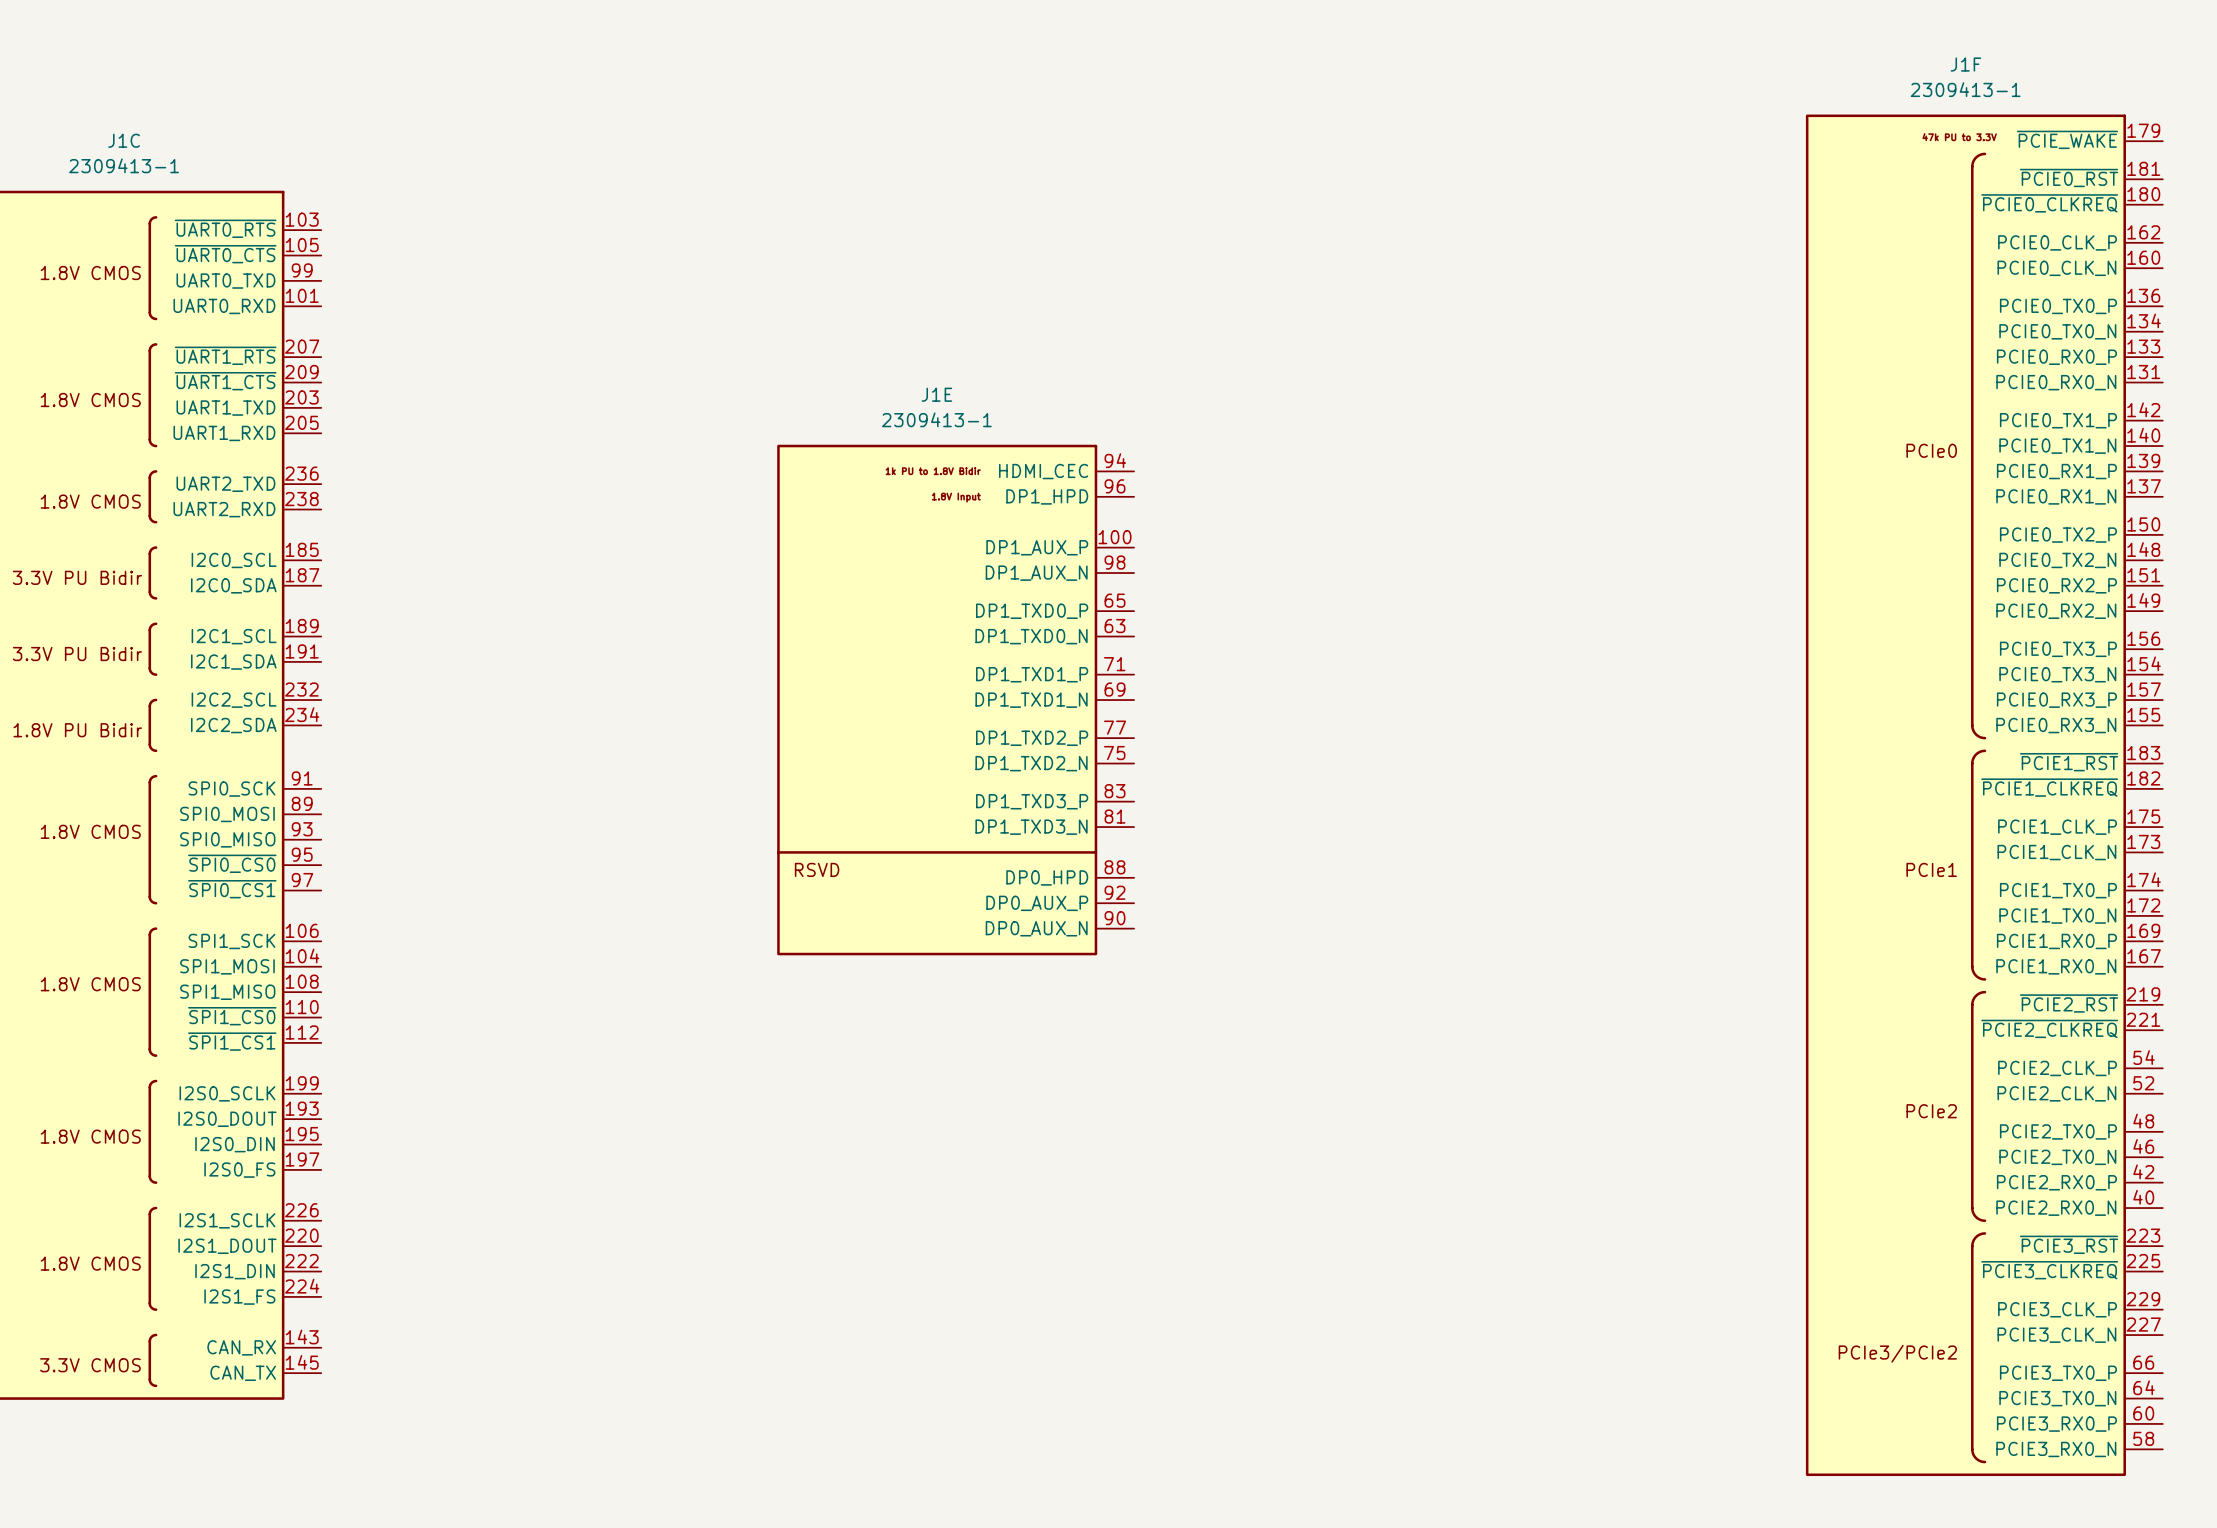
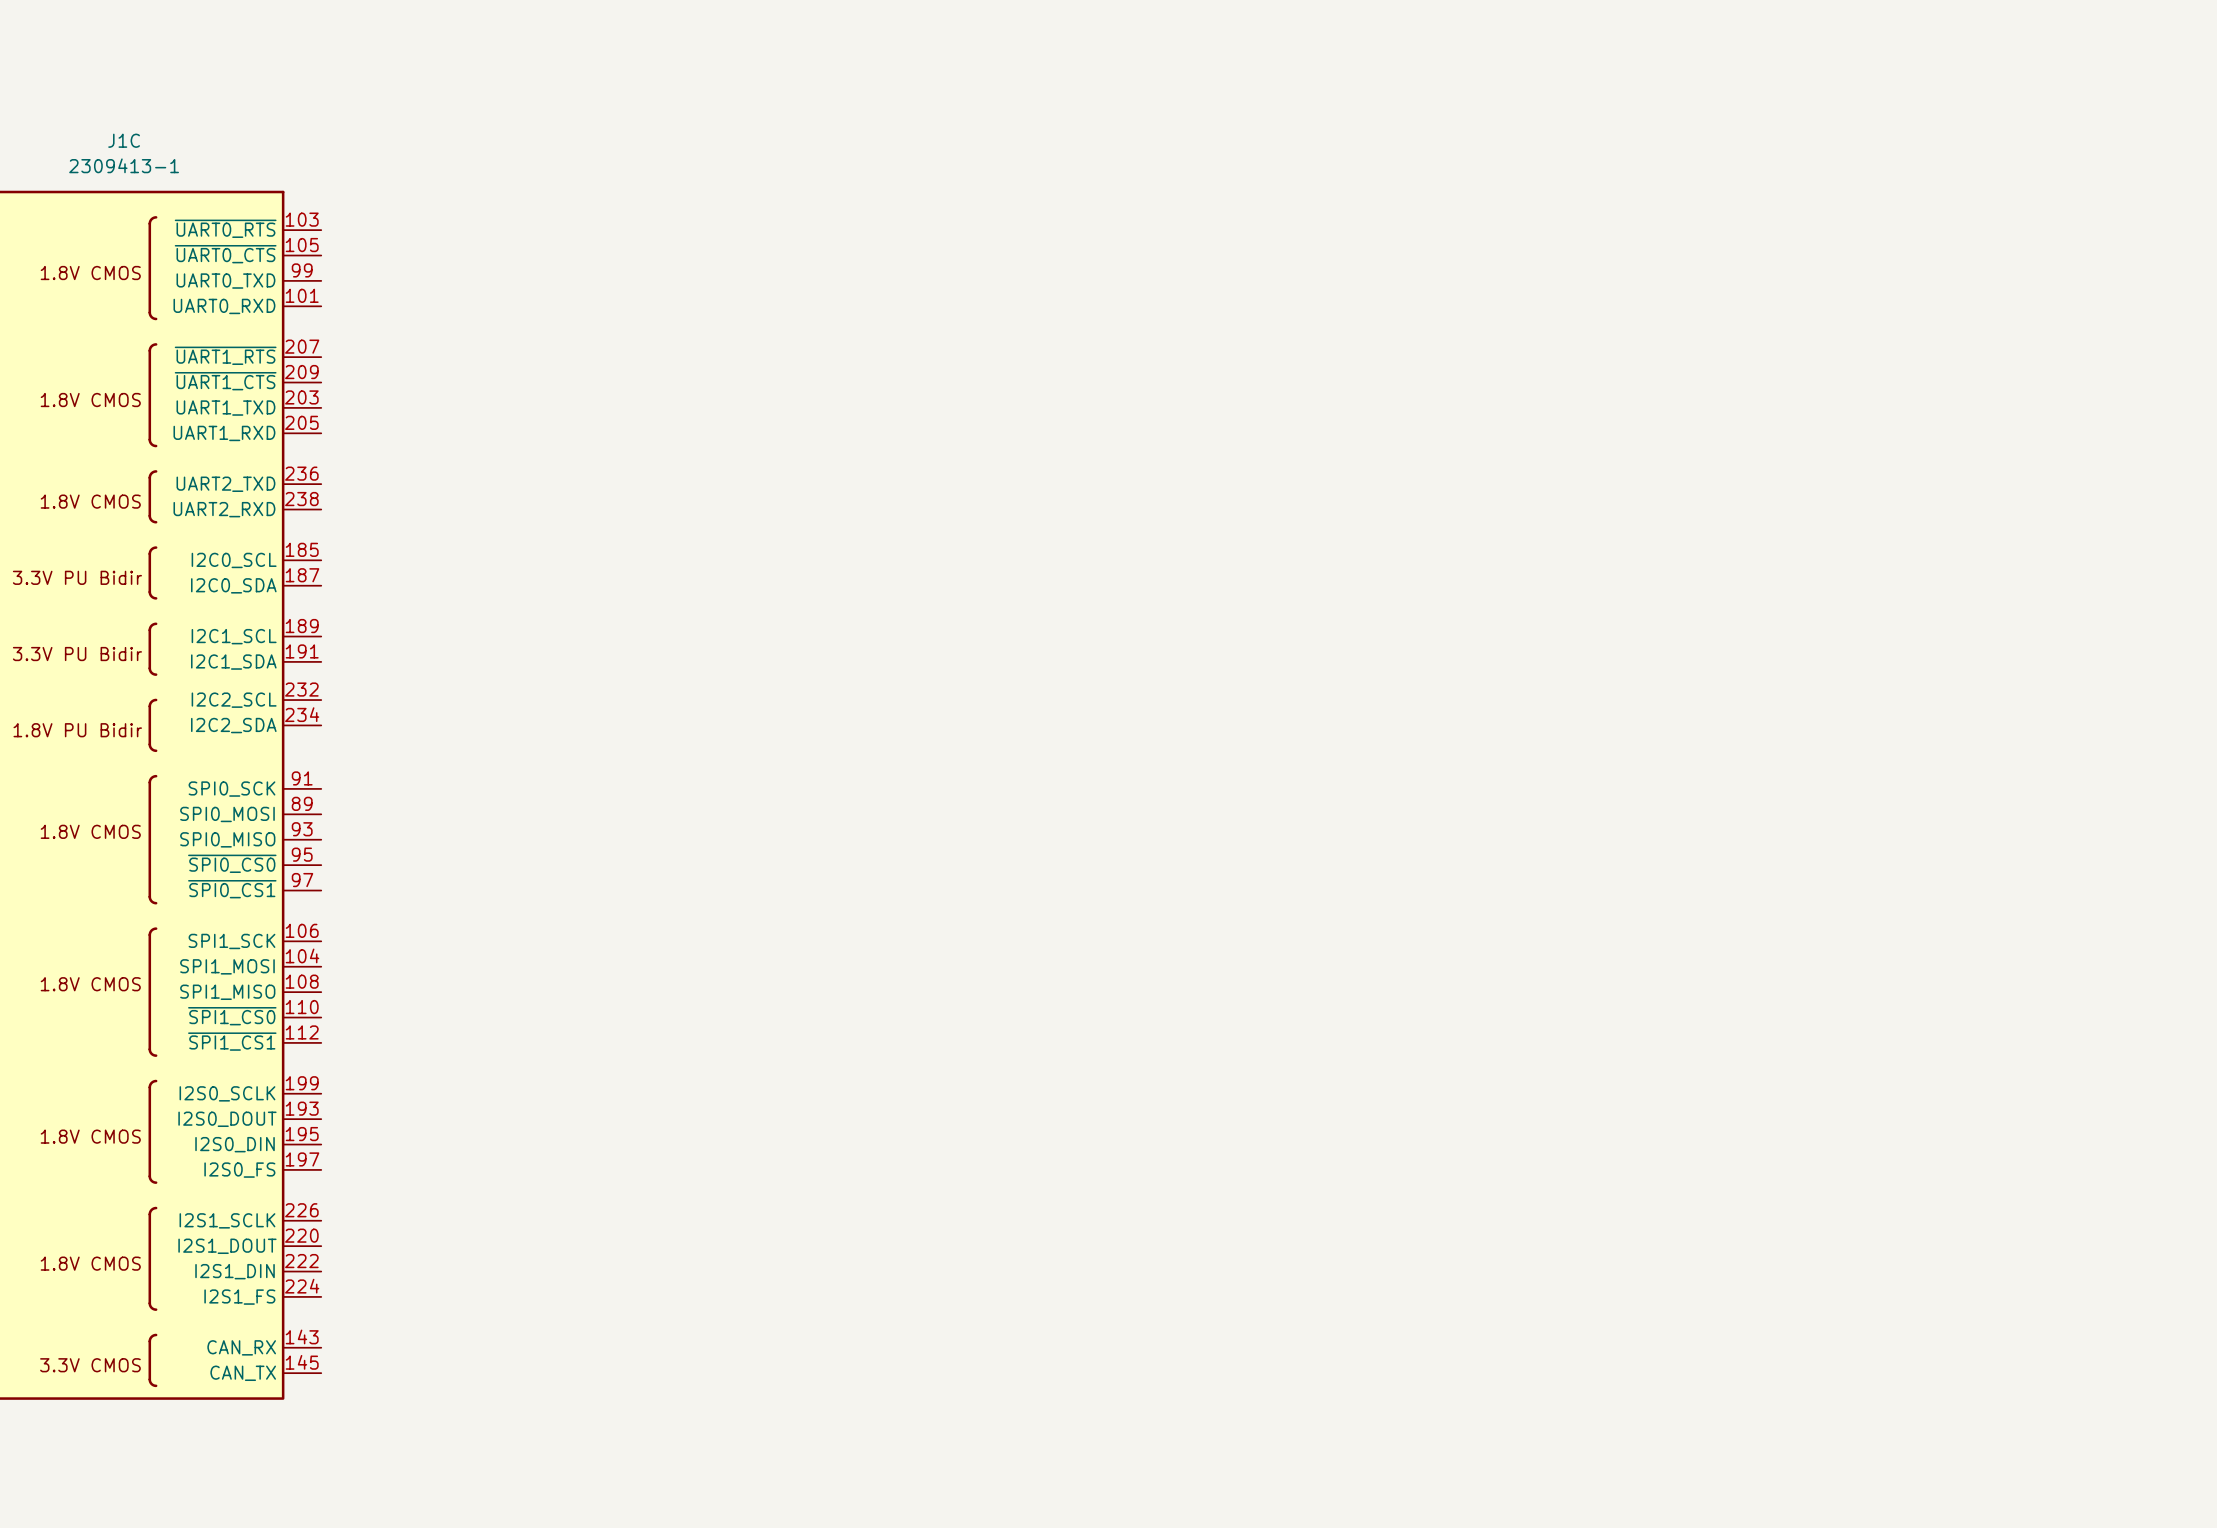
J1E: (955, 700) -> none
J1F: (1984, 795) -> none

